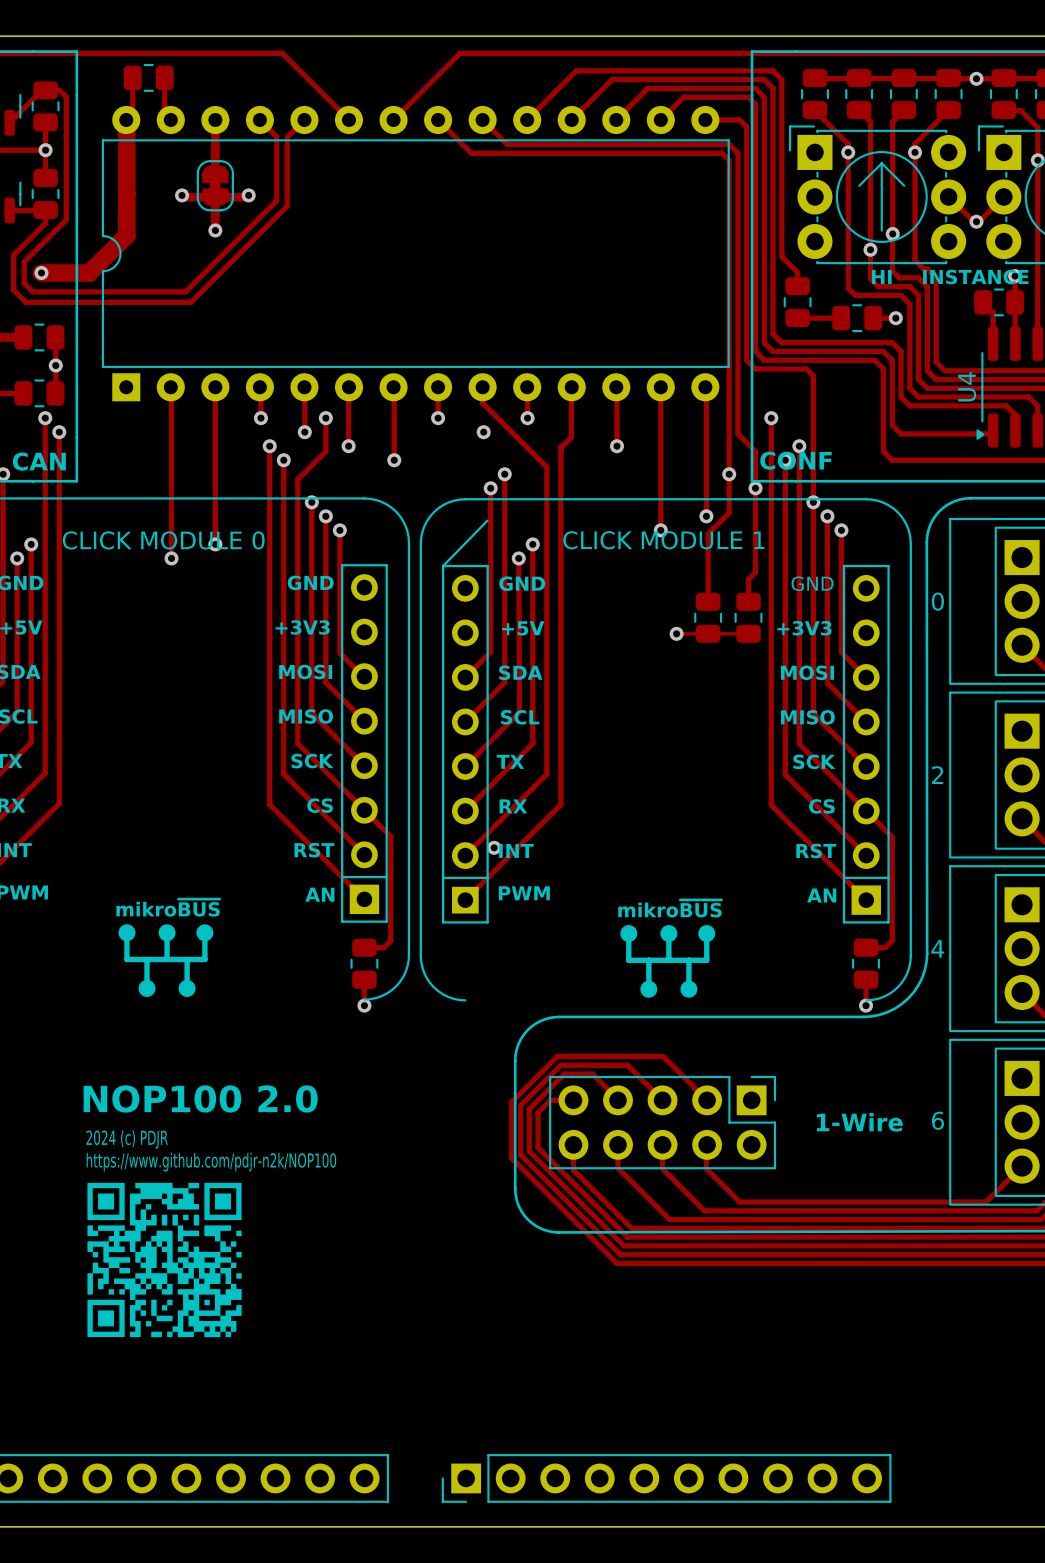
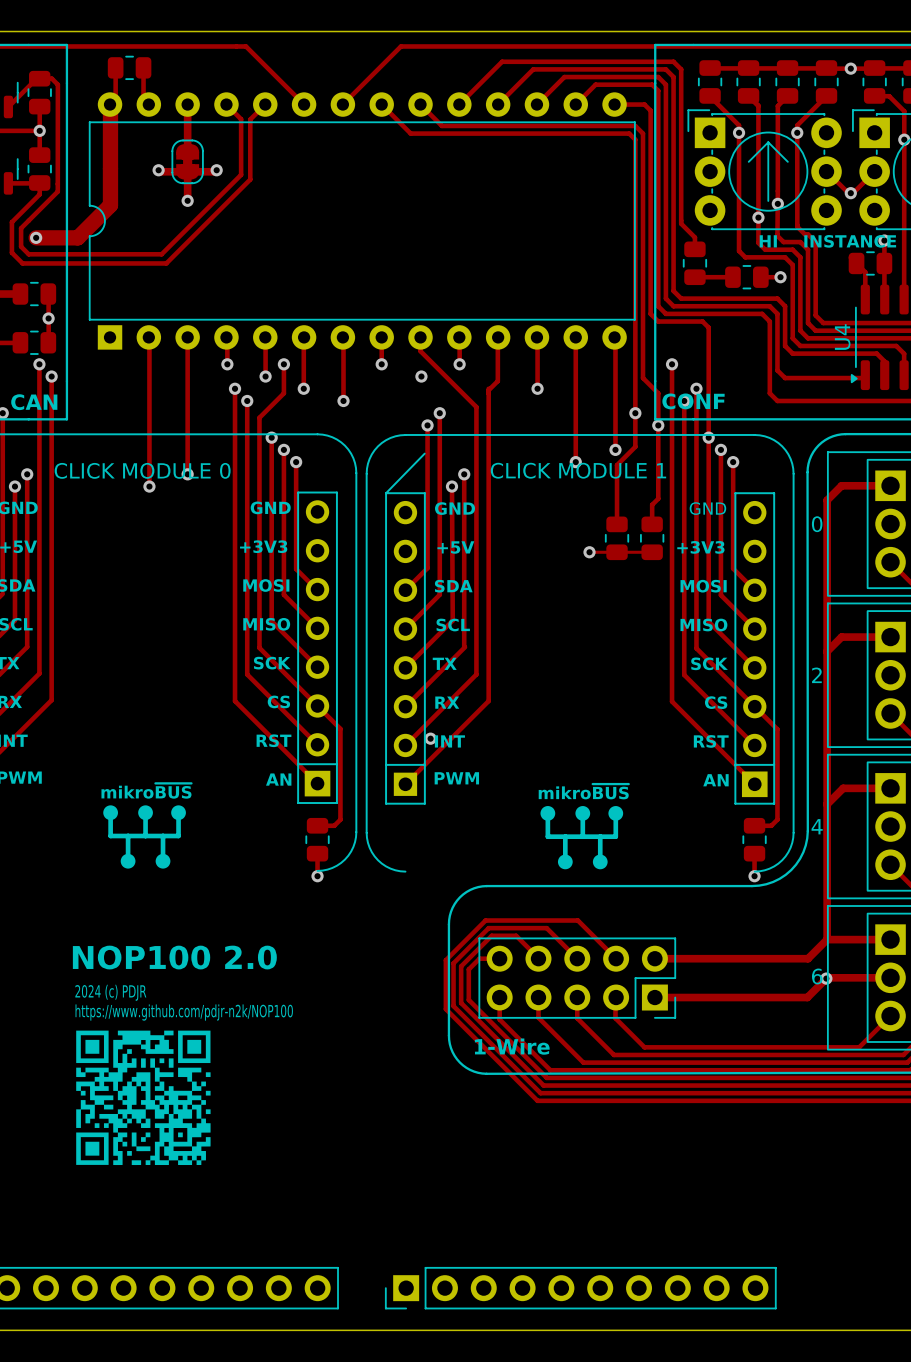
track: none -> (890, 485) (841, 485) (827, 500) (827, 939)
track: none -> (890, 637) (841, 637) (827, 651)
track: none -> (890, 788) (843, 788) (827, 804)
part footprint: [549, 1075, 777, 1170] -> [478, 937, 677, 1019]
track: none -> (827, 939) (890, 939)
track: none -> (827, 939) (808, 958) (654, 958)
text position: 1-Wire (859, 1122) -> 1-Wire (512, 1046)
track: none -> (890, 977) (827, 977) (807, 997) (654, 997)
via: none -> (826, 978)

